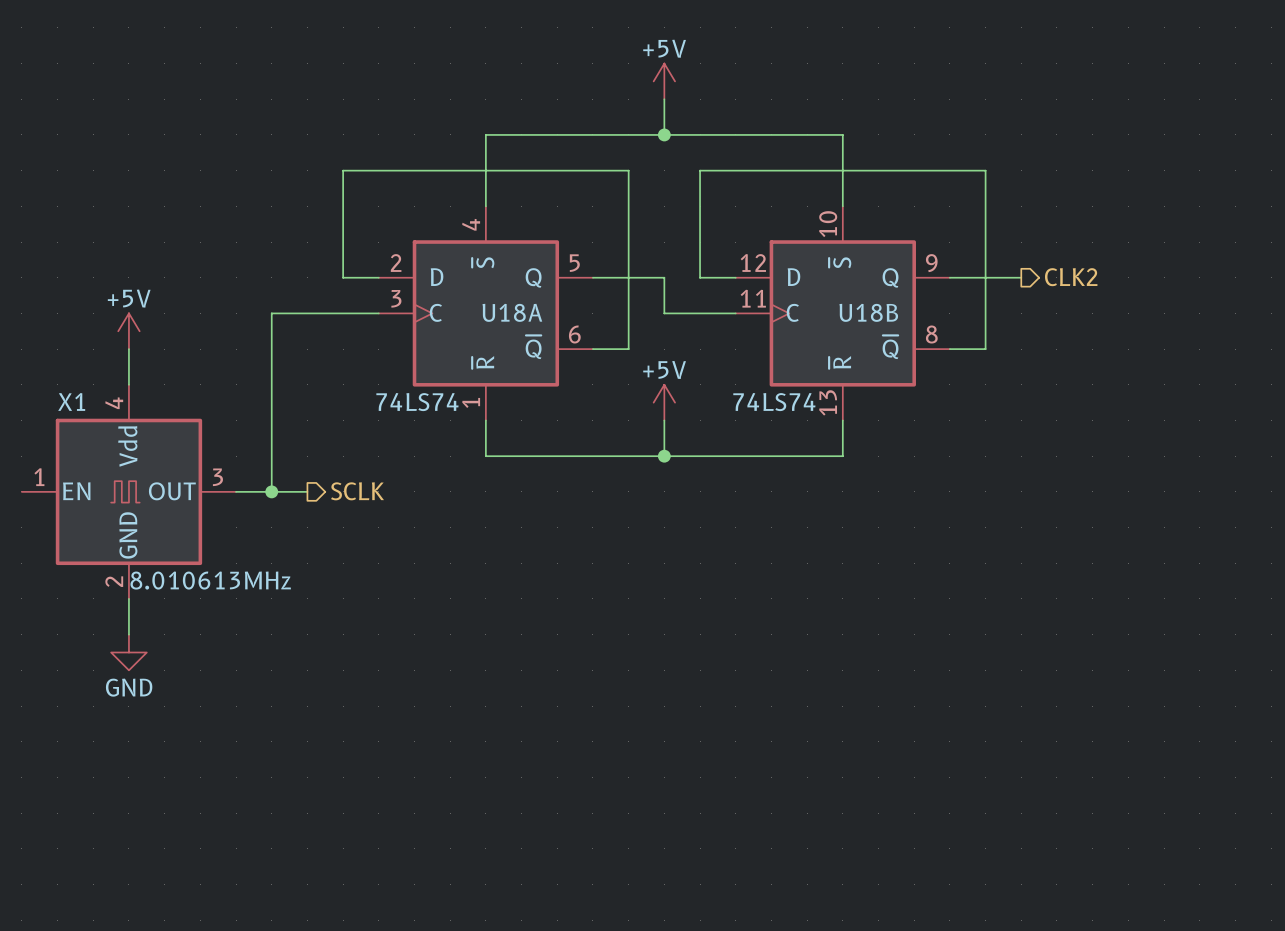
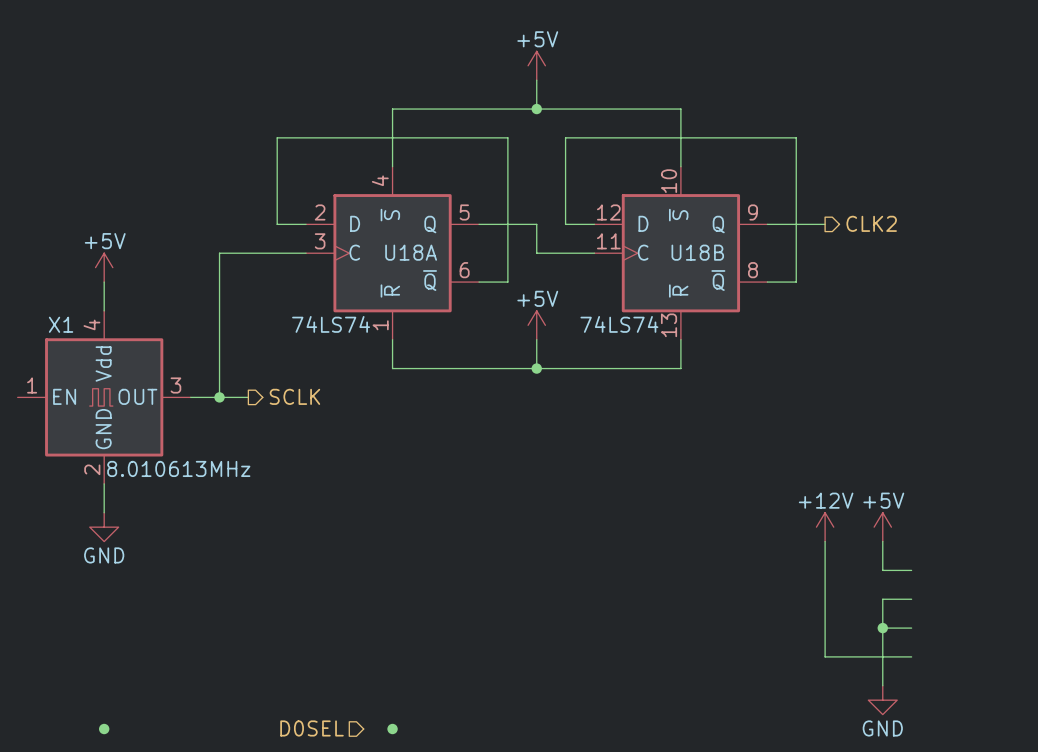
power symbol: none -> +12V (825, 527)
power symbol: none -> +5V (882, 527)
wire: none -> (825, 541) (825, 656) (911, 656)
wire: none -> (882, 541) (882, 570) (911, 570)
wire: none -> (911, 599) (882, 599) (882, 685)
wire: none -> (882, 628) (911, 628)
junction: none -> (882, 628)
power symbol: none -> GND (882, 700)
hierarchical label: none -> D0SEL (312, 728)
junction: none -> (104, 729)
junction: none -> (392, 729)

